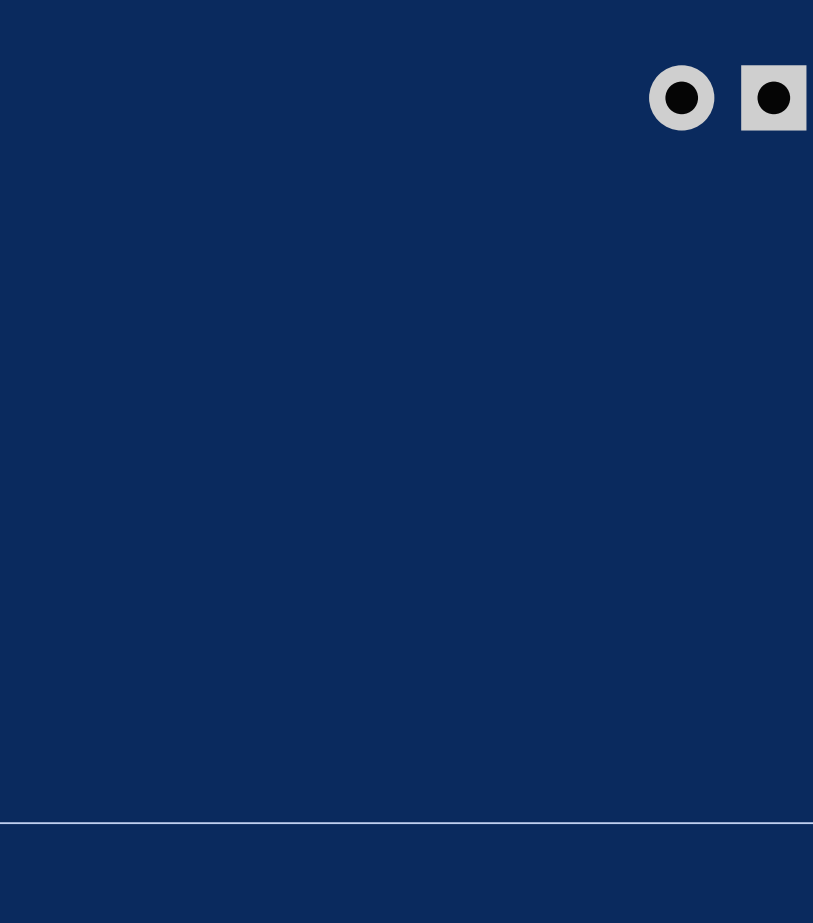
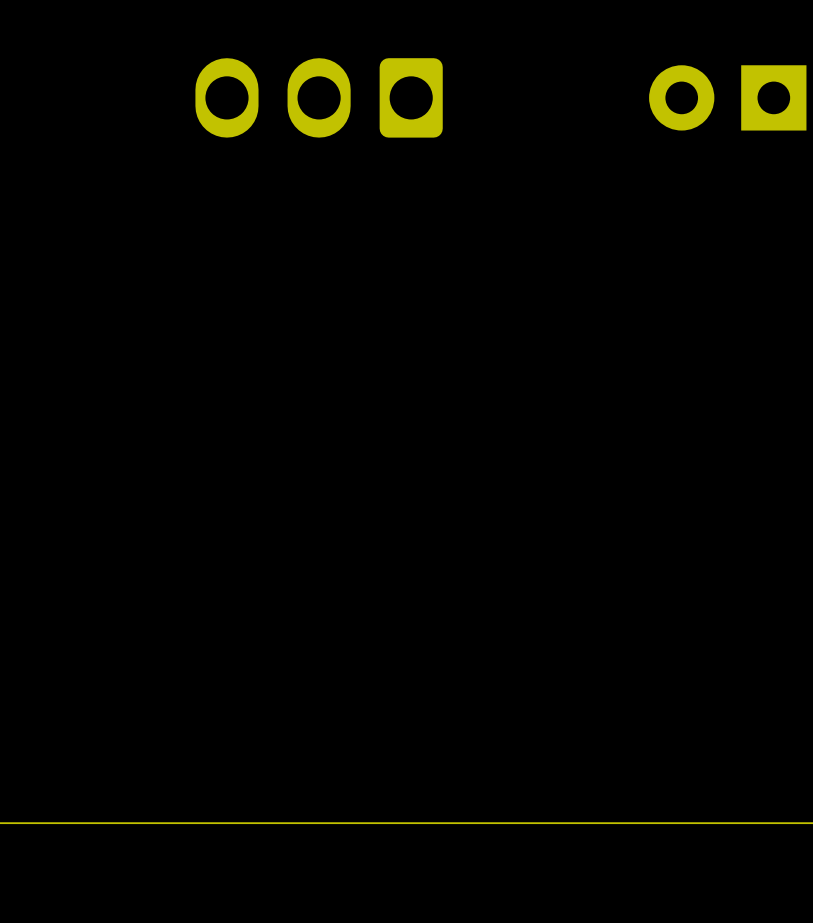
part: none -> (319, 97)

